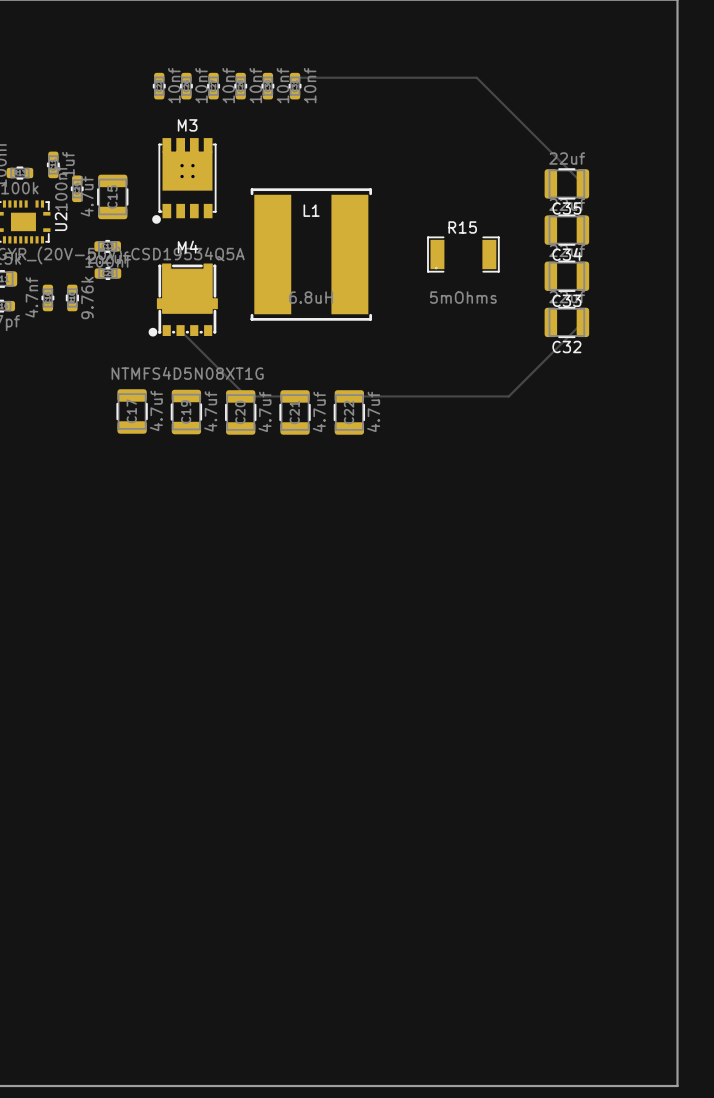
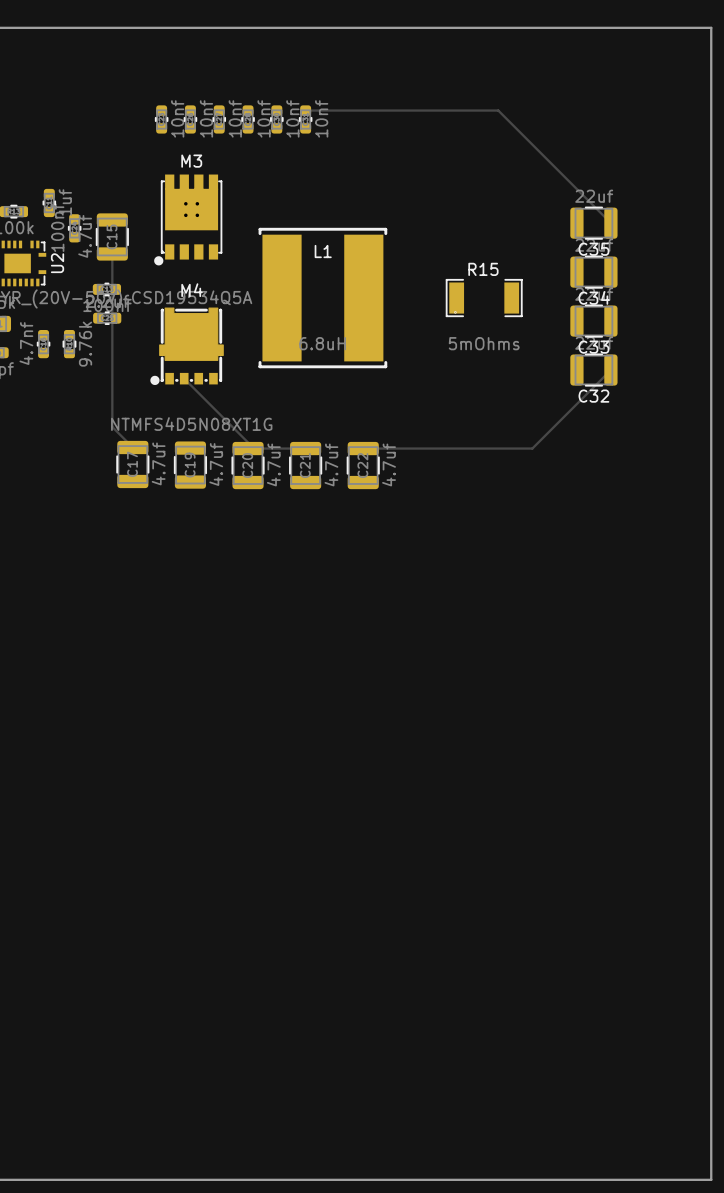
track: none -> (112, 253) (112, 427) (132, 447)

